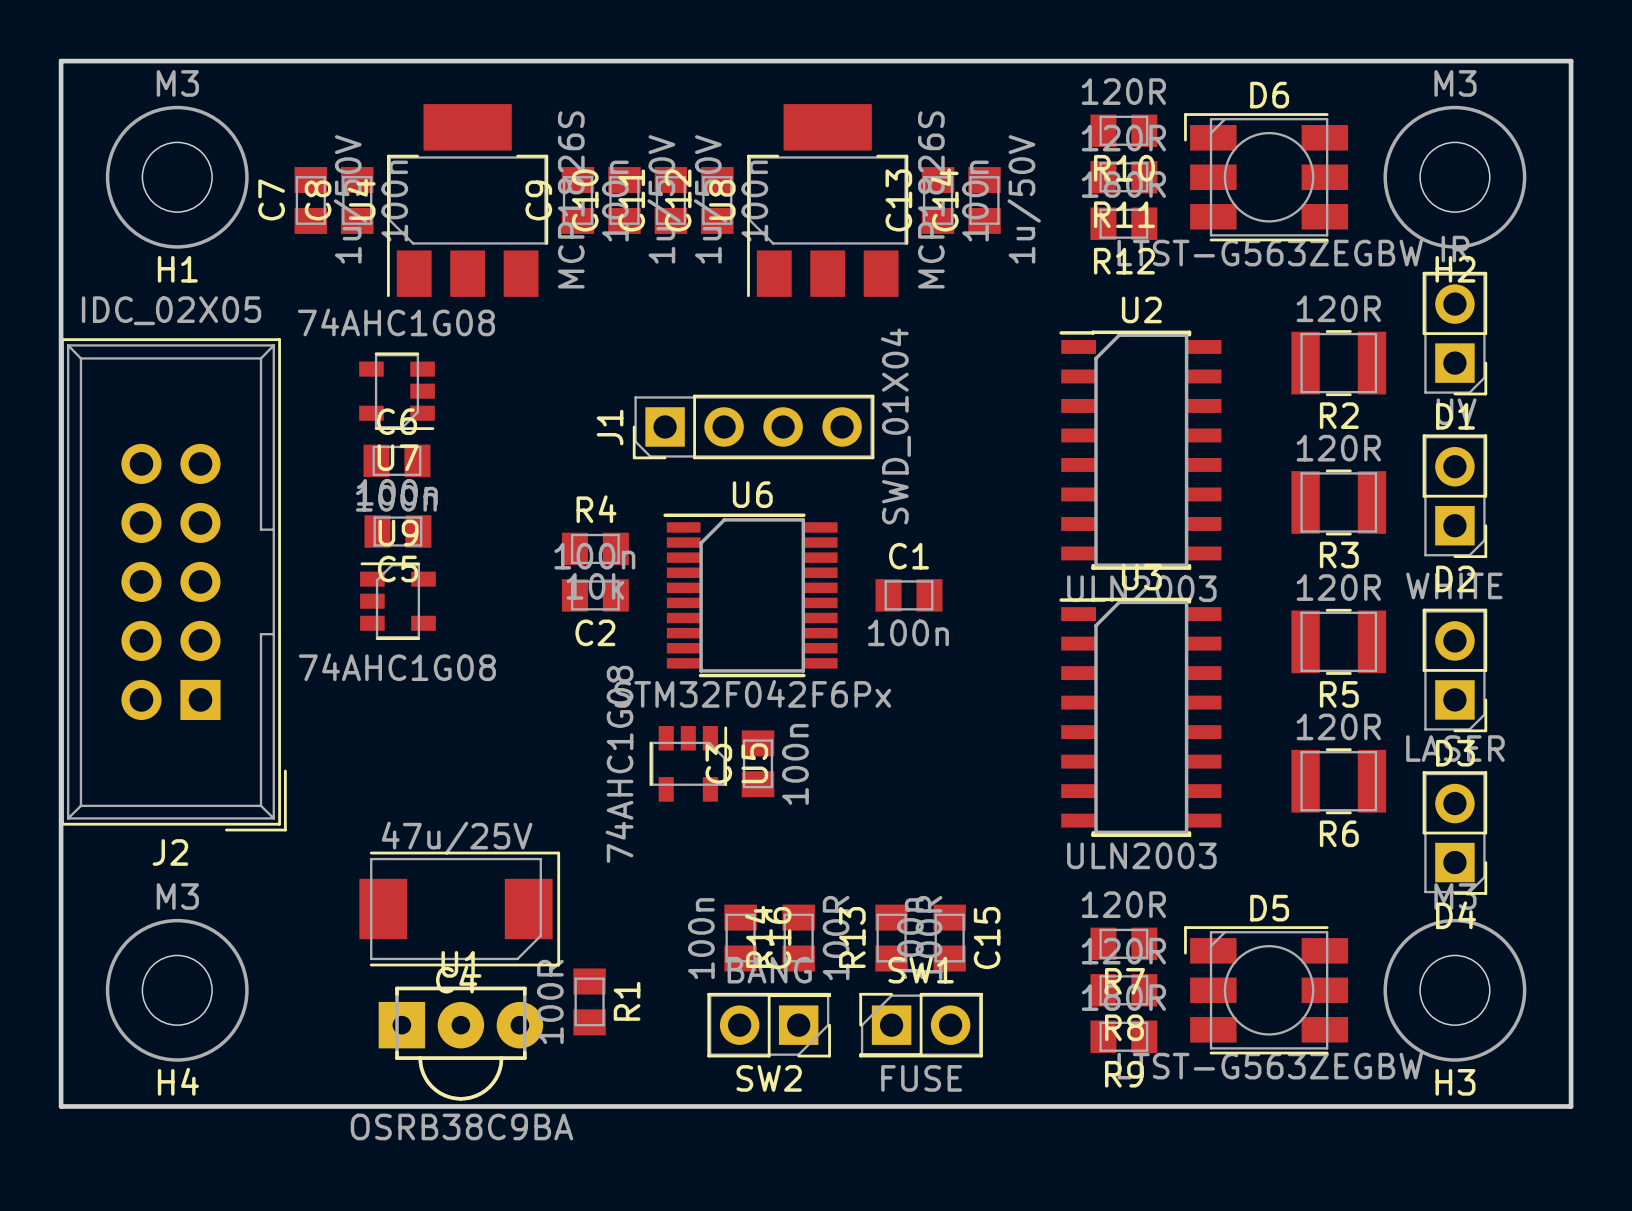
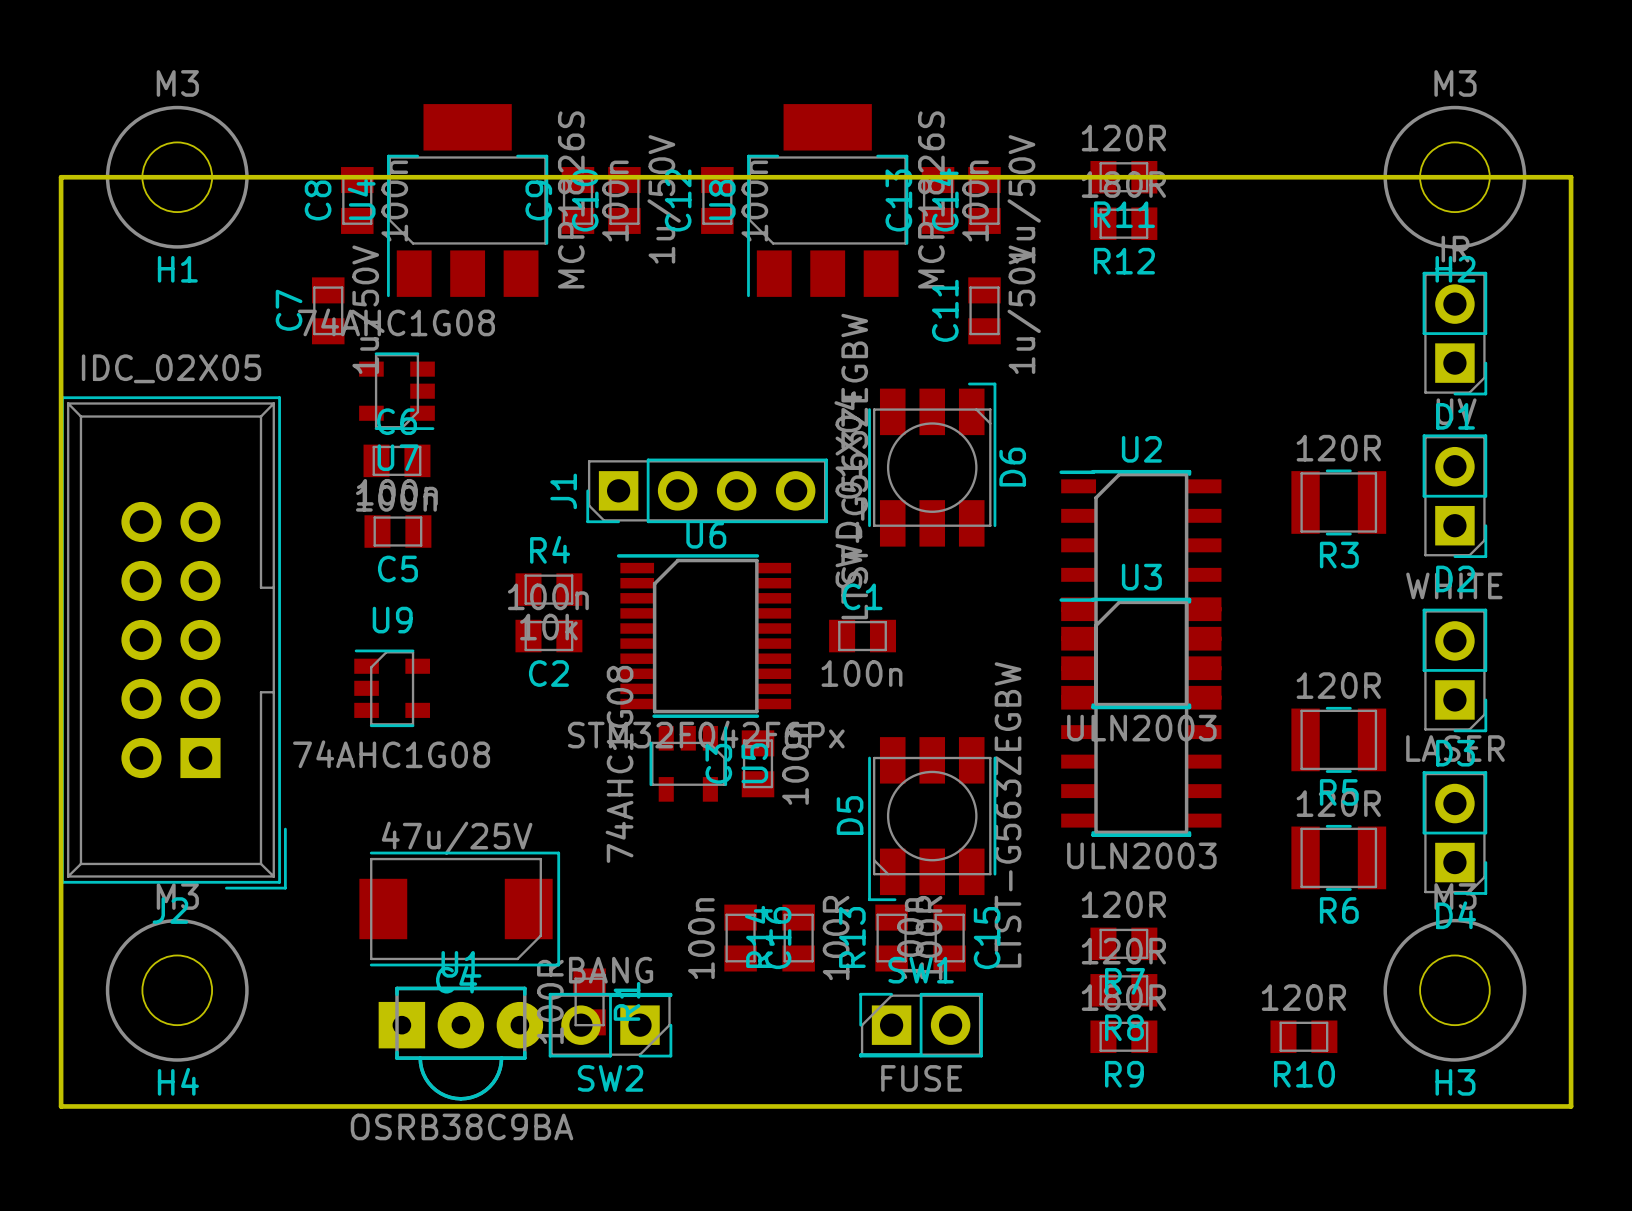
R10 position: (1123, 130) -> (1303, 1036)
board edge: (61, 177) (61, 61) (1571, 61) (1571, 177) -> (61, 177) (1571, 177)
D6 rotation: 0° (1266, 177) -> 90° clockwise (932, 464)
D6 position: (1266, 177) -> (932, 464)
C7 position: (310, 200) -> (328, 310)
C11 position: (670, 200) -> (984, 310)
R2: 120R (1338, 363) -> none
J1 position: (753, 426) -> (707, 490)
U2 position: (1140, 450) -> (1140, 589)
R4 position: (595, 548) -> (548, 589)
J2 position: (173, 584) -> (173, 642)
C2 position: (595, 595) -> (548, 636)
U6 position: (750, 595) -> (704, 636)
C1 position: (909, 595) -> (862, 636)
U9 position: (397, 601) -> (392, 688)
R5 position: (1338, 641) -> (1338, 739)
R6 position: (1338, 781) -> (1338, 857)
D5 rotation: 0° (1266, 990) -> 90° counterclockwise (932, 819)
D5 position: (1266, 990) -> (932, 819)
SW2 position: (769, 1025) -> (610, 1025)

